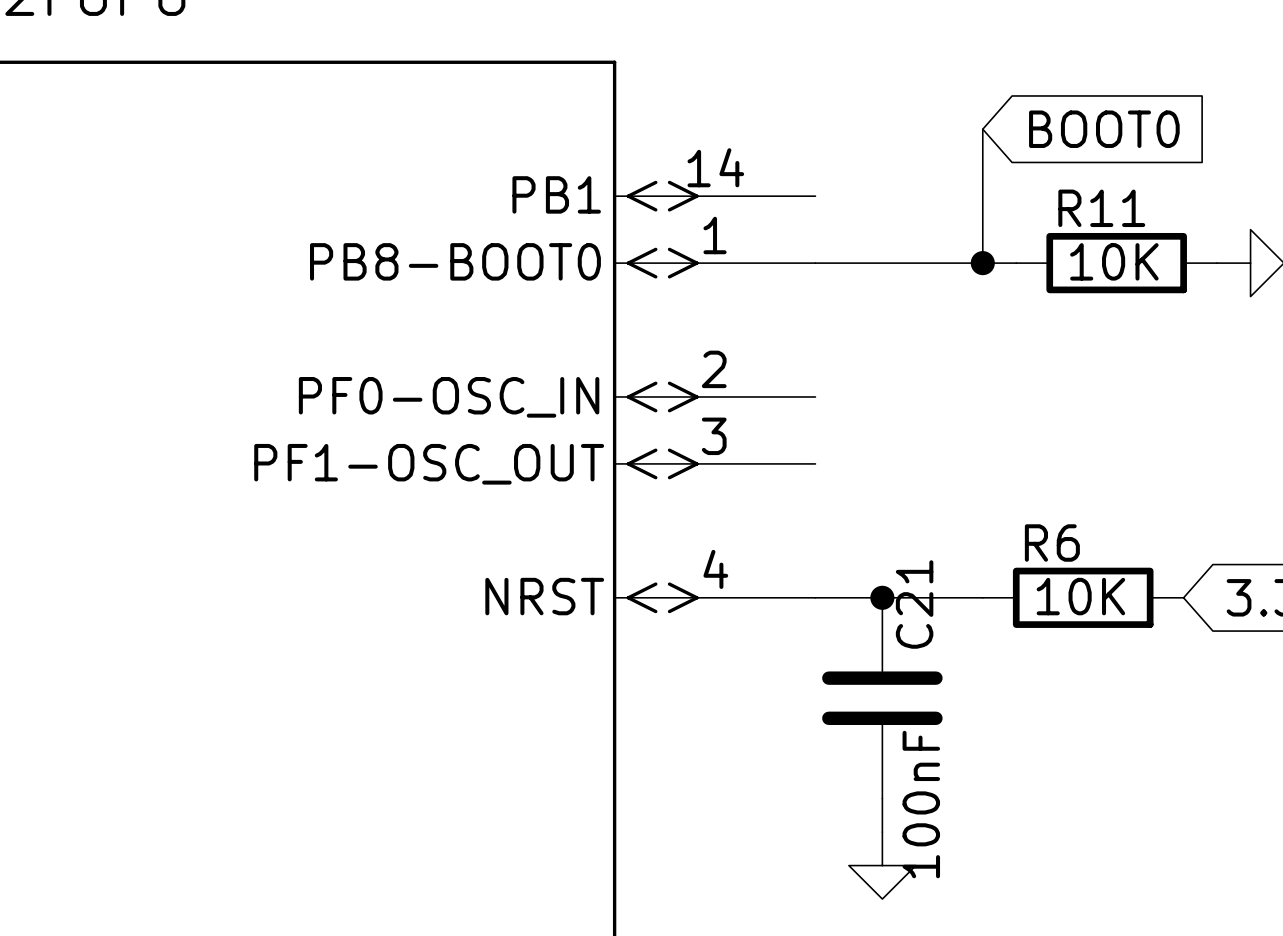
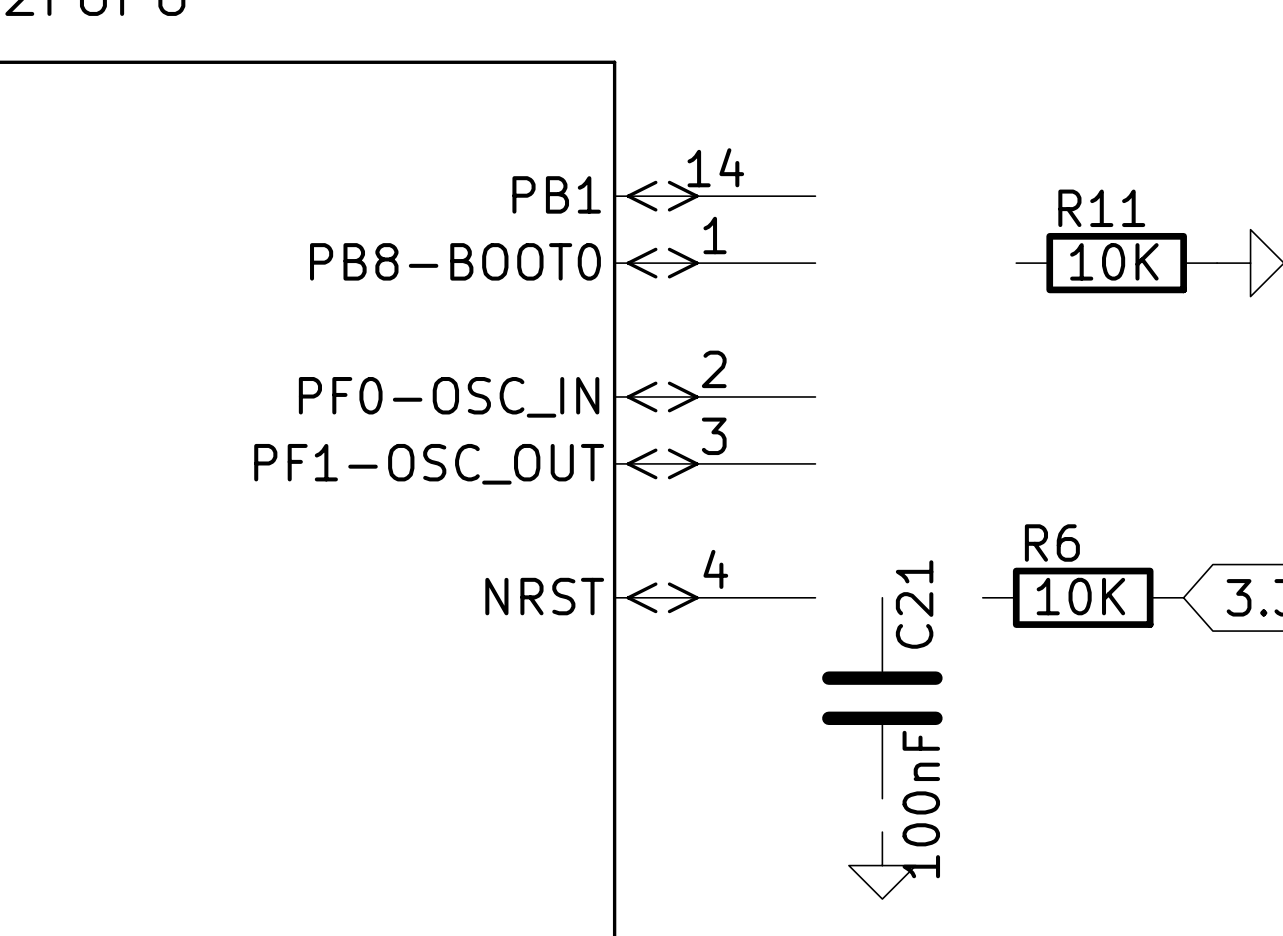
wire: (982, 129) (982, 263) -> none
global label: BOOT0 (1104, 129) -> none
wire: (815, 263) (1016, 263) -> none
junction: (982, 263) -> none
wire: (815, 597) (982, 597) -> none
junction: (882, 597) -> none
wire: (882, 798) (882, 832) -> none

